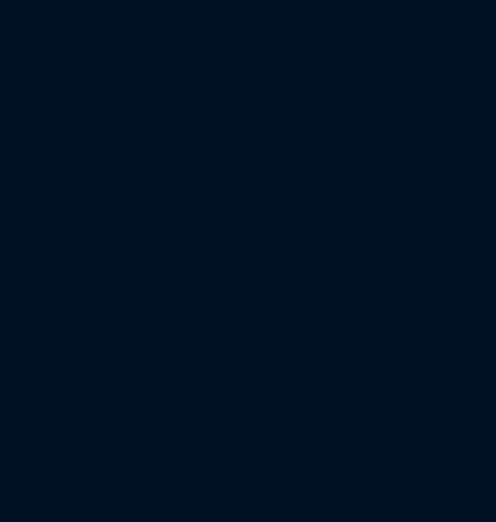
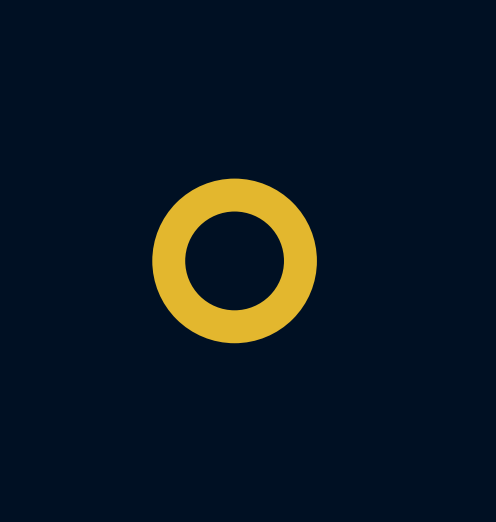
part: none -> (234, 260)

